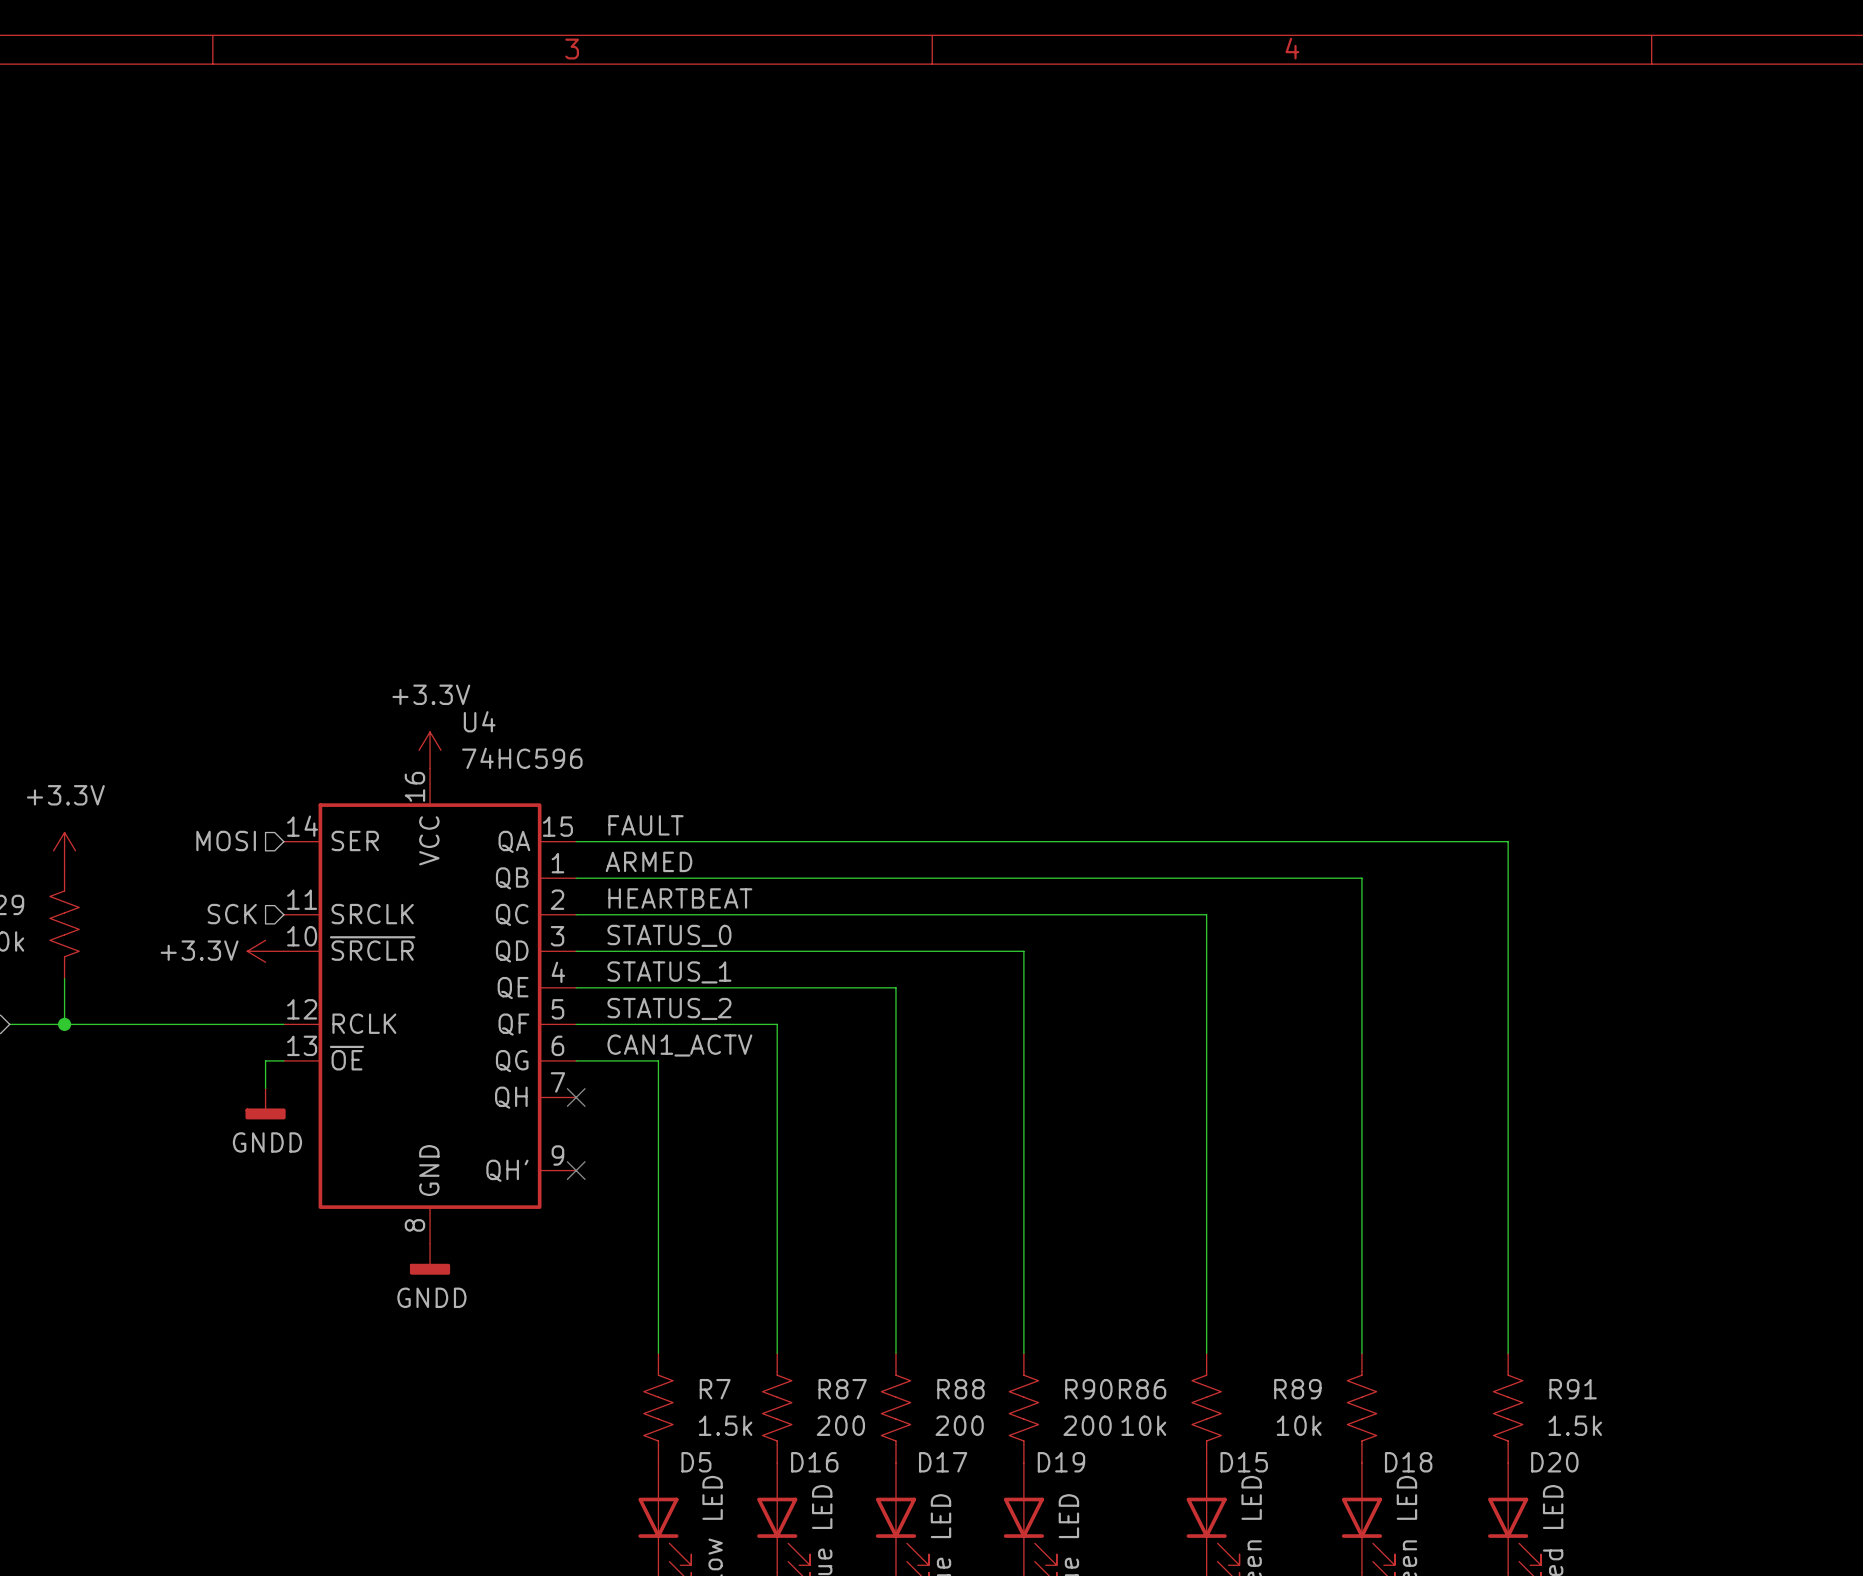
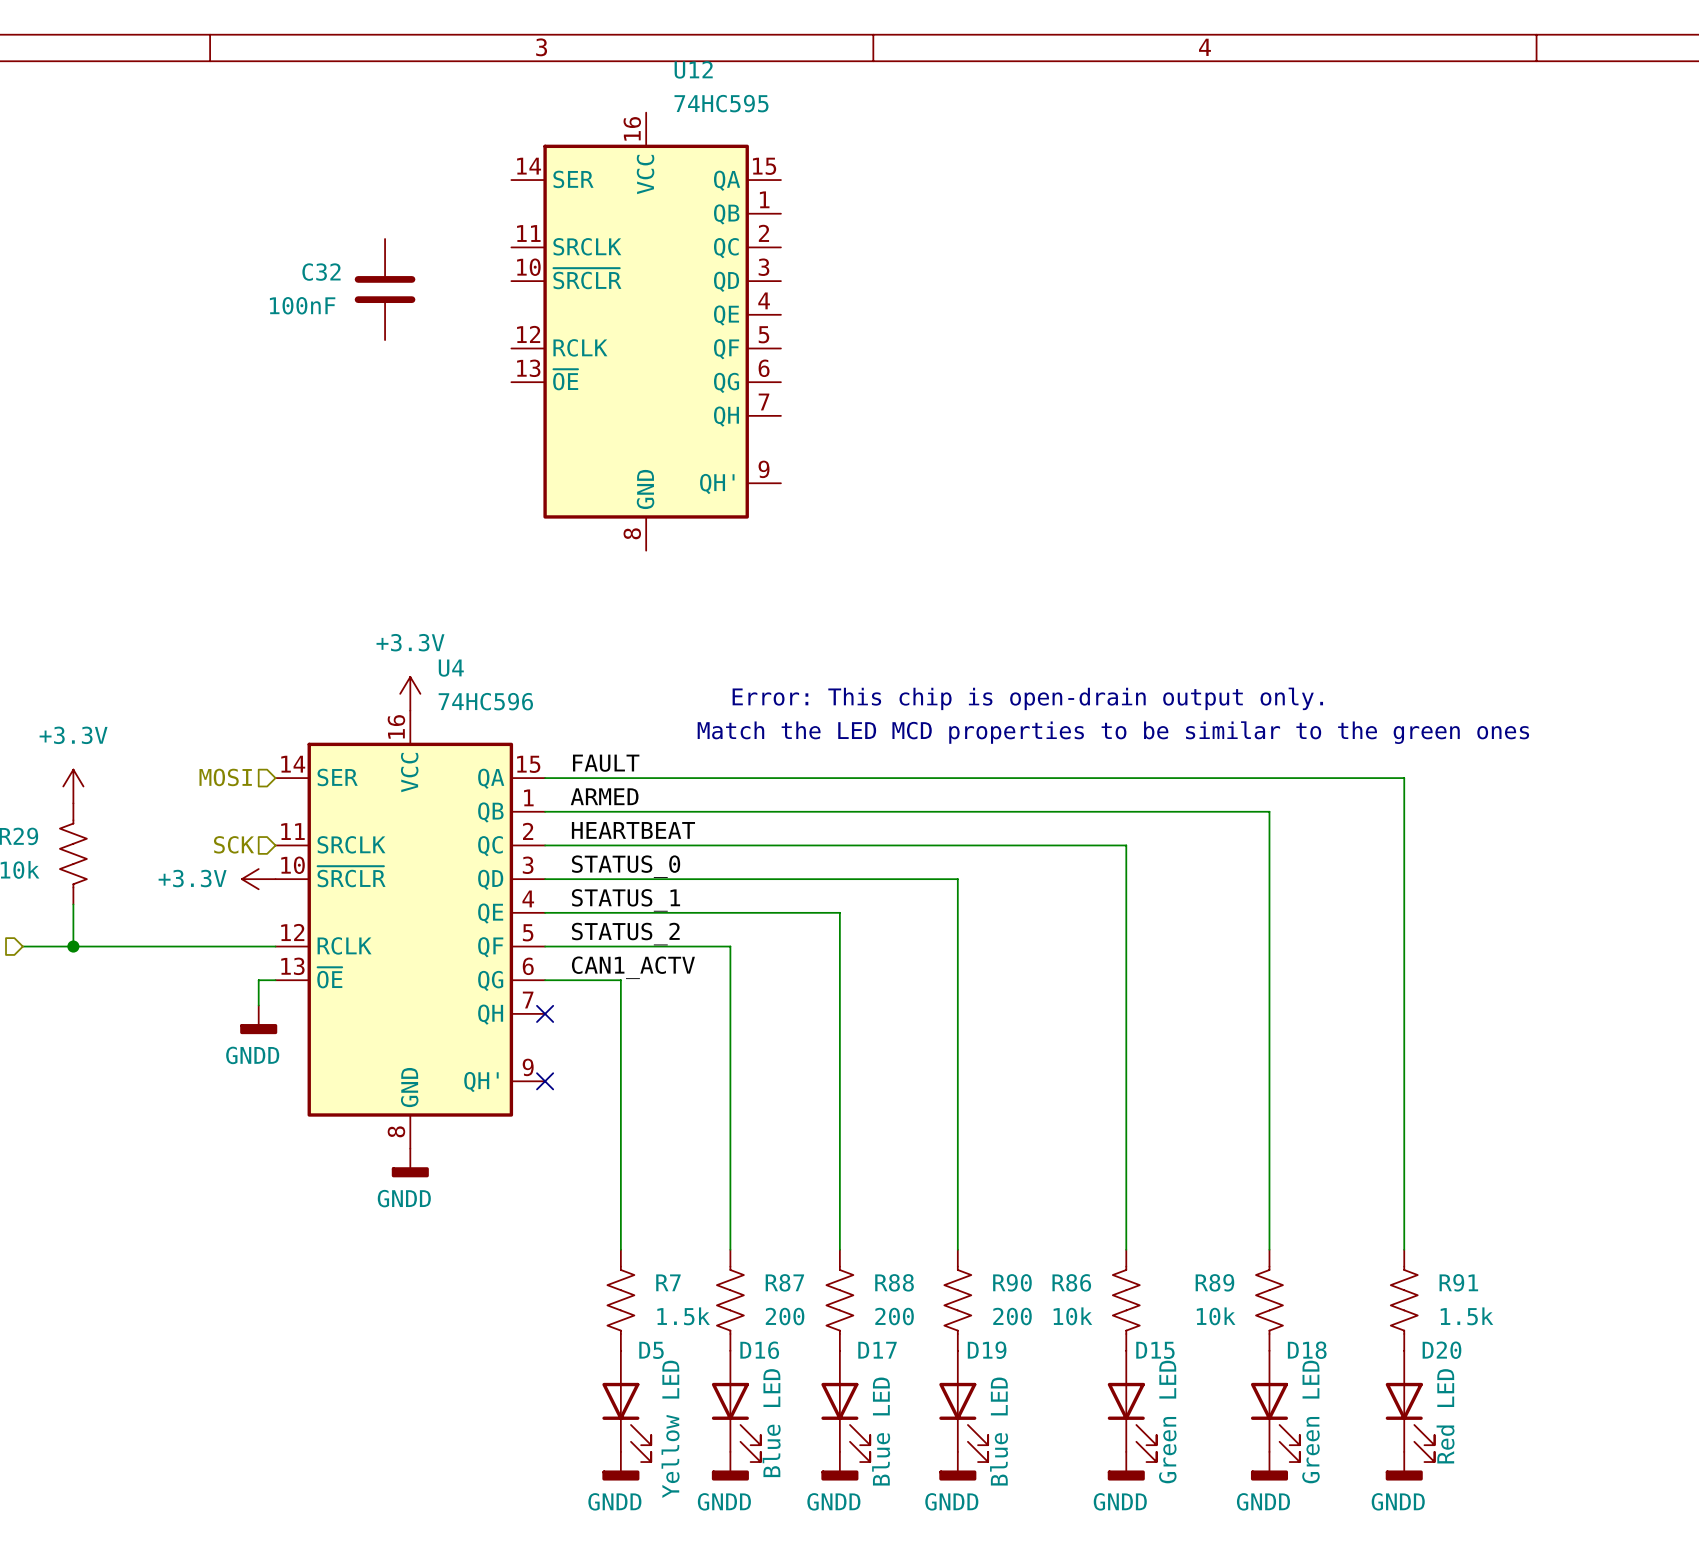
C32: none -> 100nF (385, 289)
U12: none -> 74HC595 (646, 331)
text: none -> Error: This chip is open-drain output only. (1027, 698)
text: none -> Match the LED MCD properties to be similar to the green ones (1113, 732)

